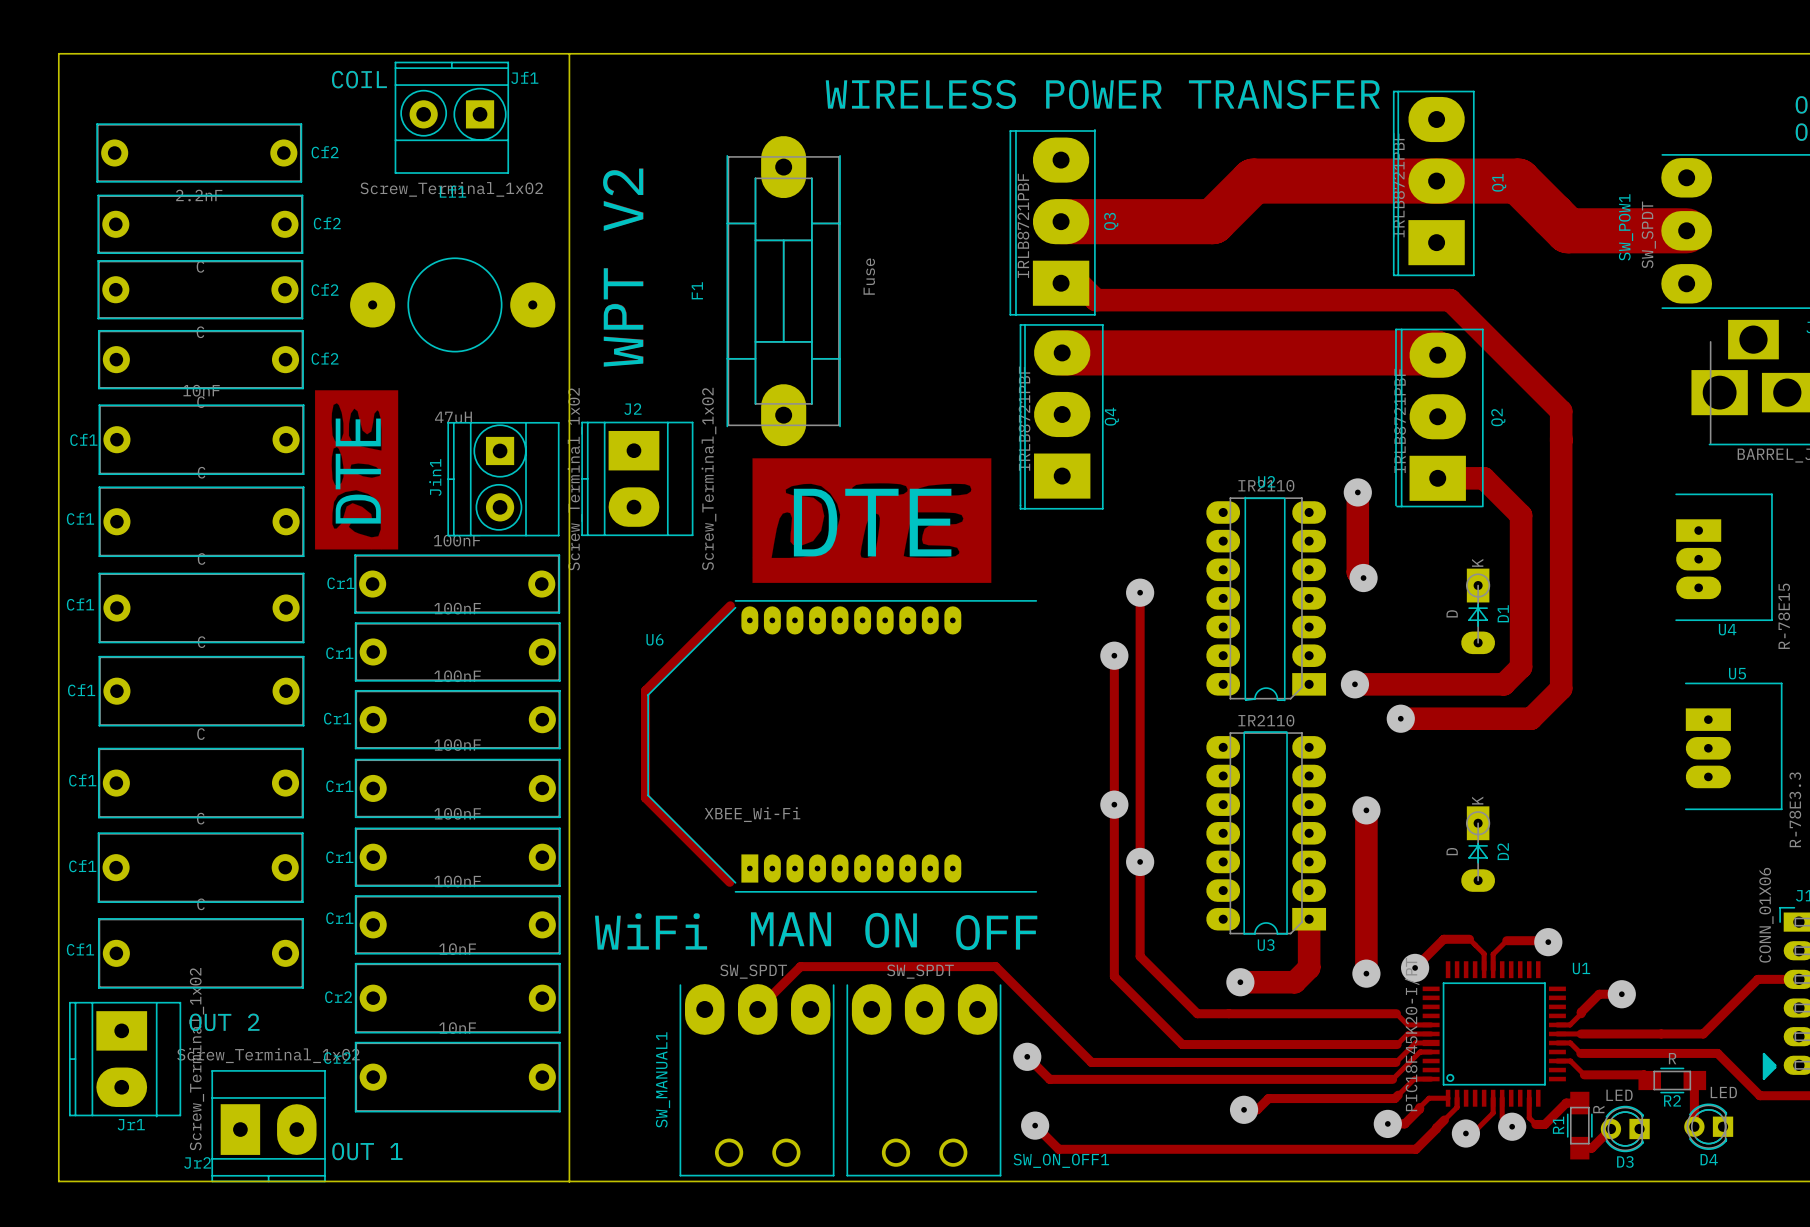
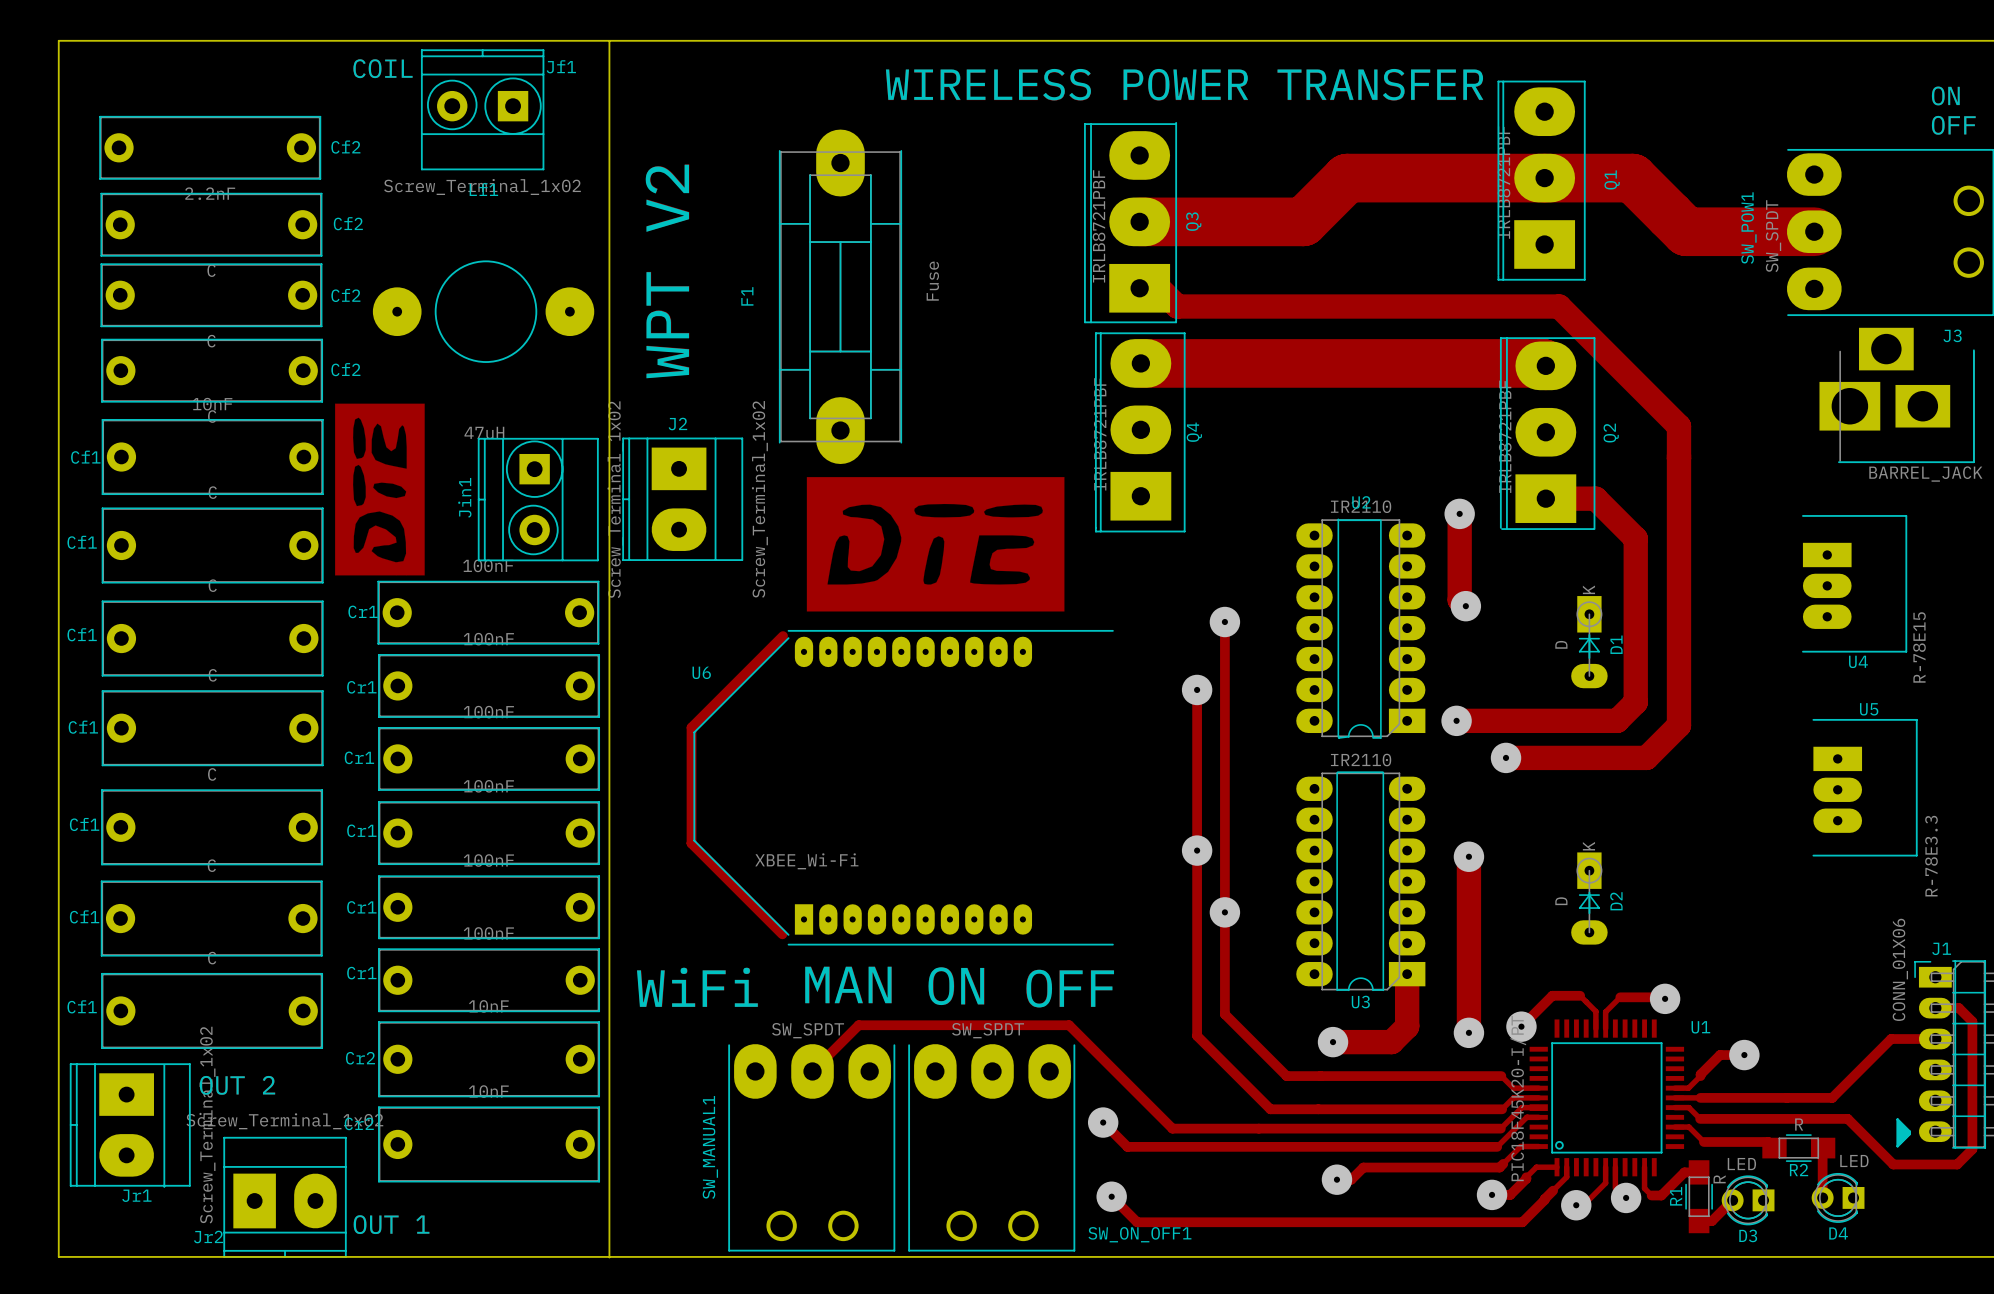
text: DTE (358, 471) -> none
text: DTE (872, 522) -> none

